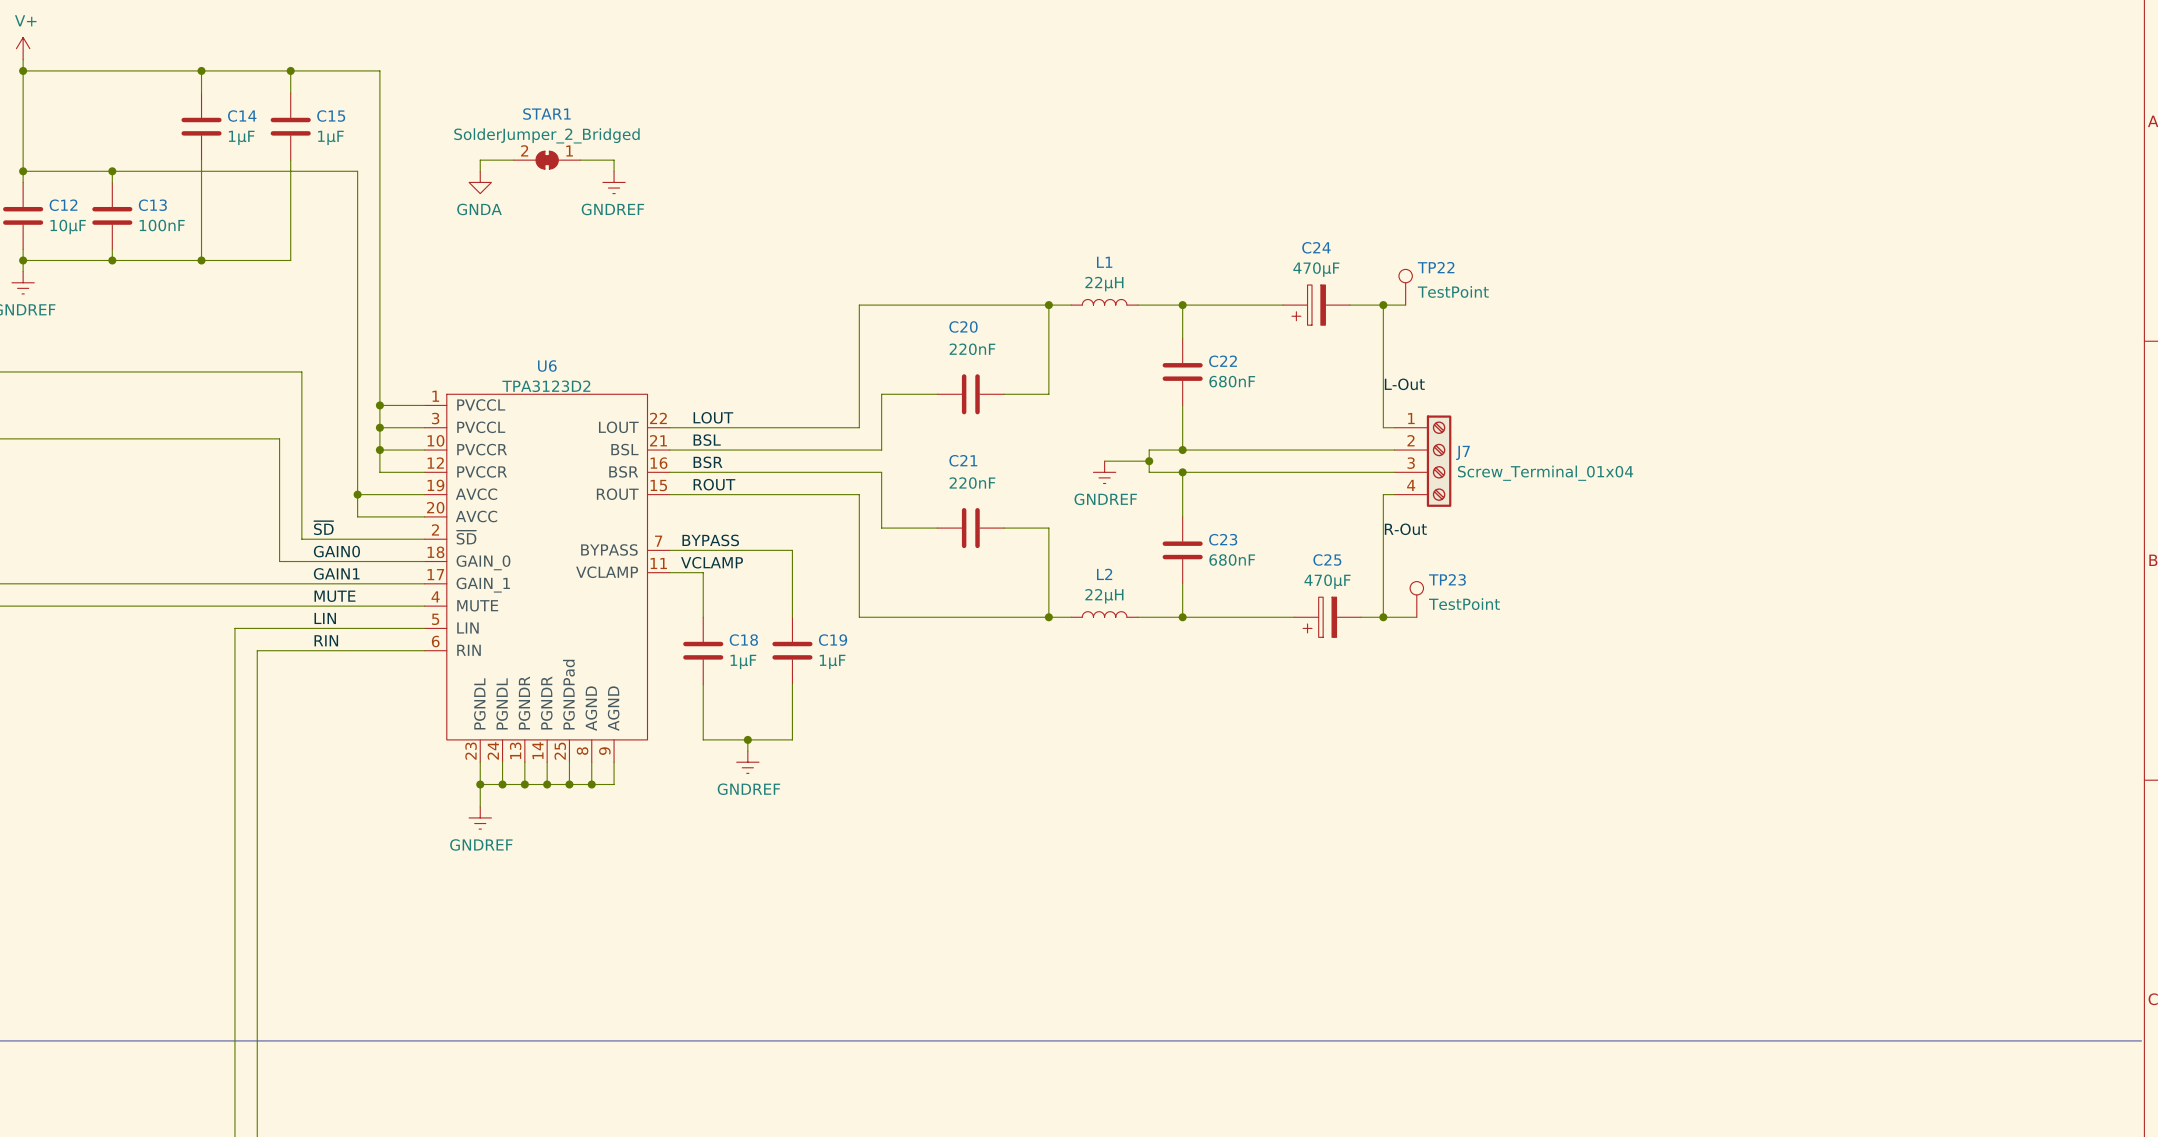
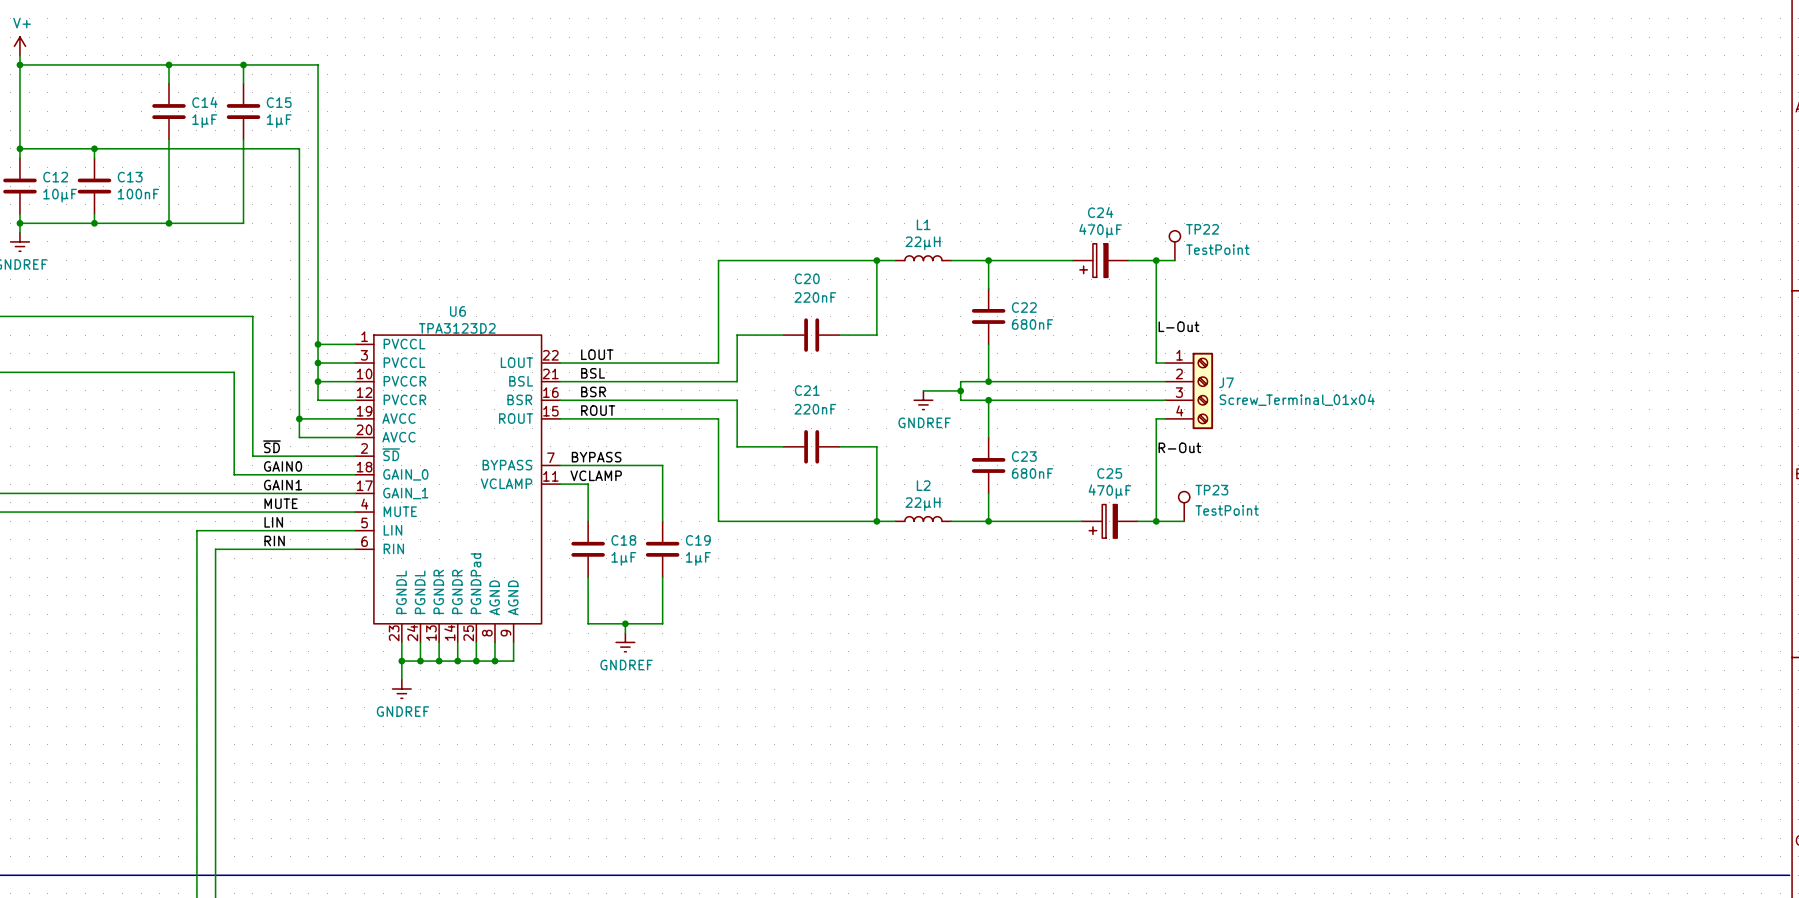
wire: (513, 160) (480, 160) (480, 171) -> none
STAR1: SolderJumper_2_Bridged (547, 160) -> none
wire: (580, 160) (614, 160) (614, 171) -> none
power symbol: GNDA (480, 182) -> none
power symbol: GNDREF (614, 182) -> none

